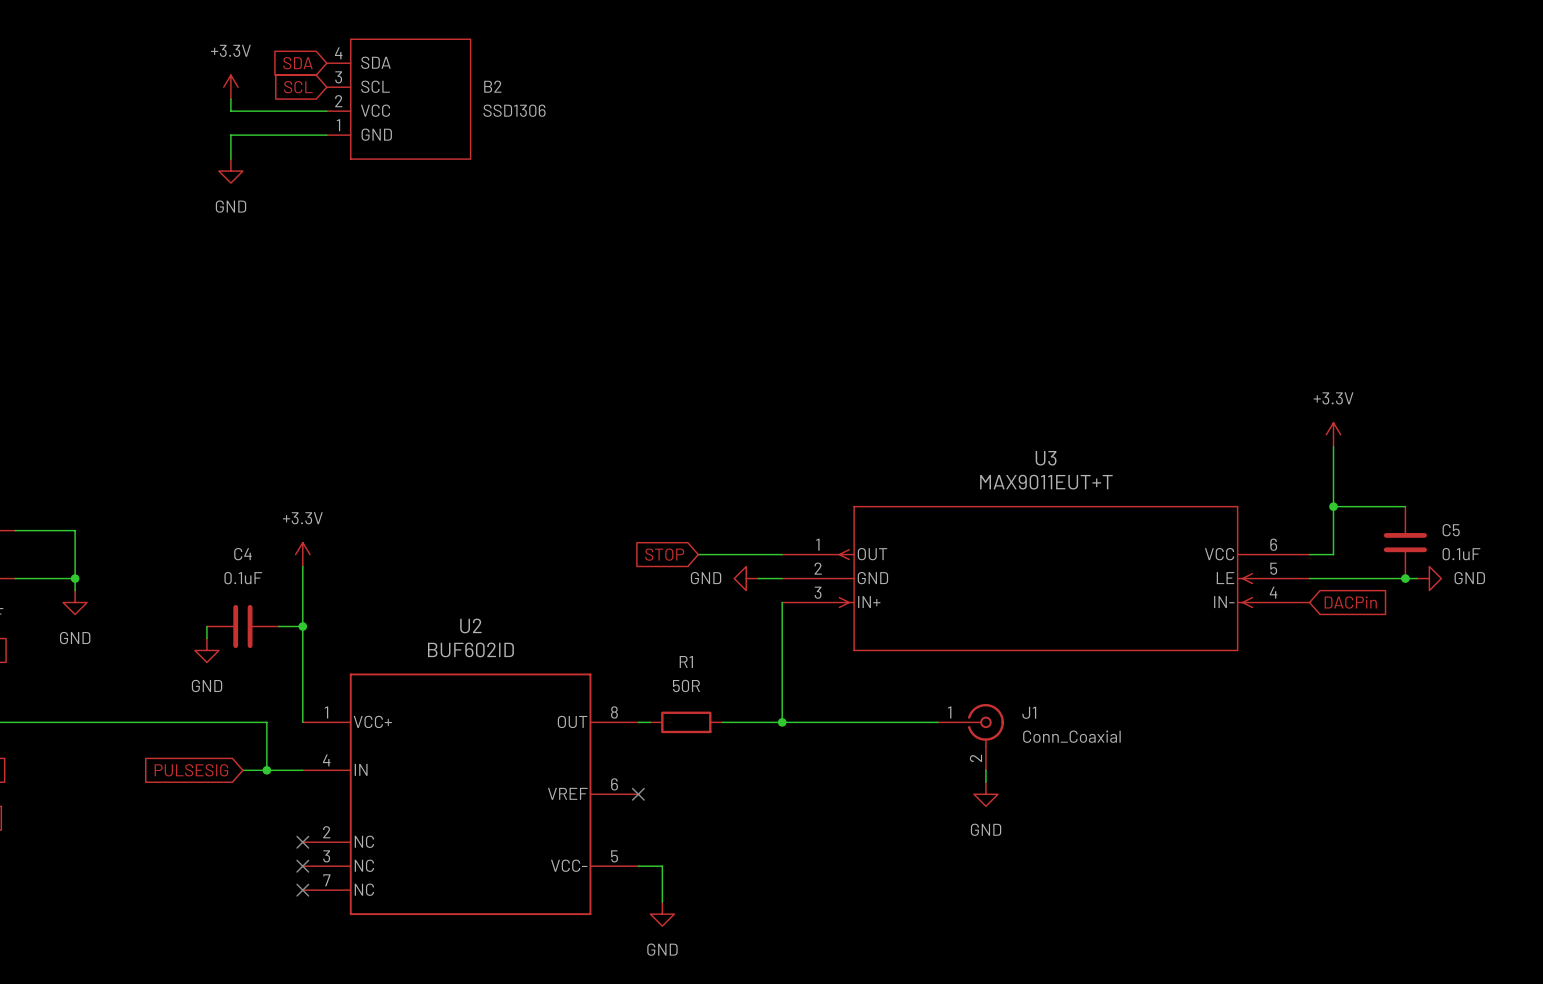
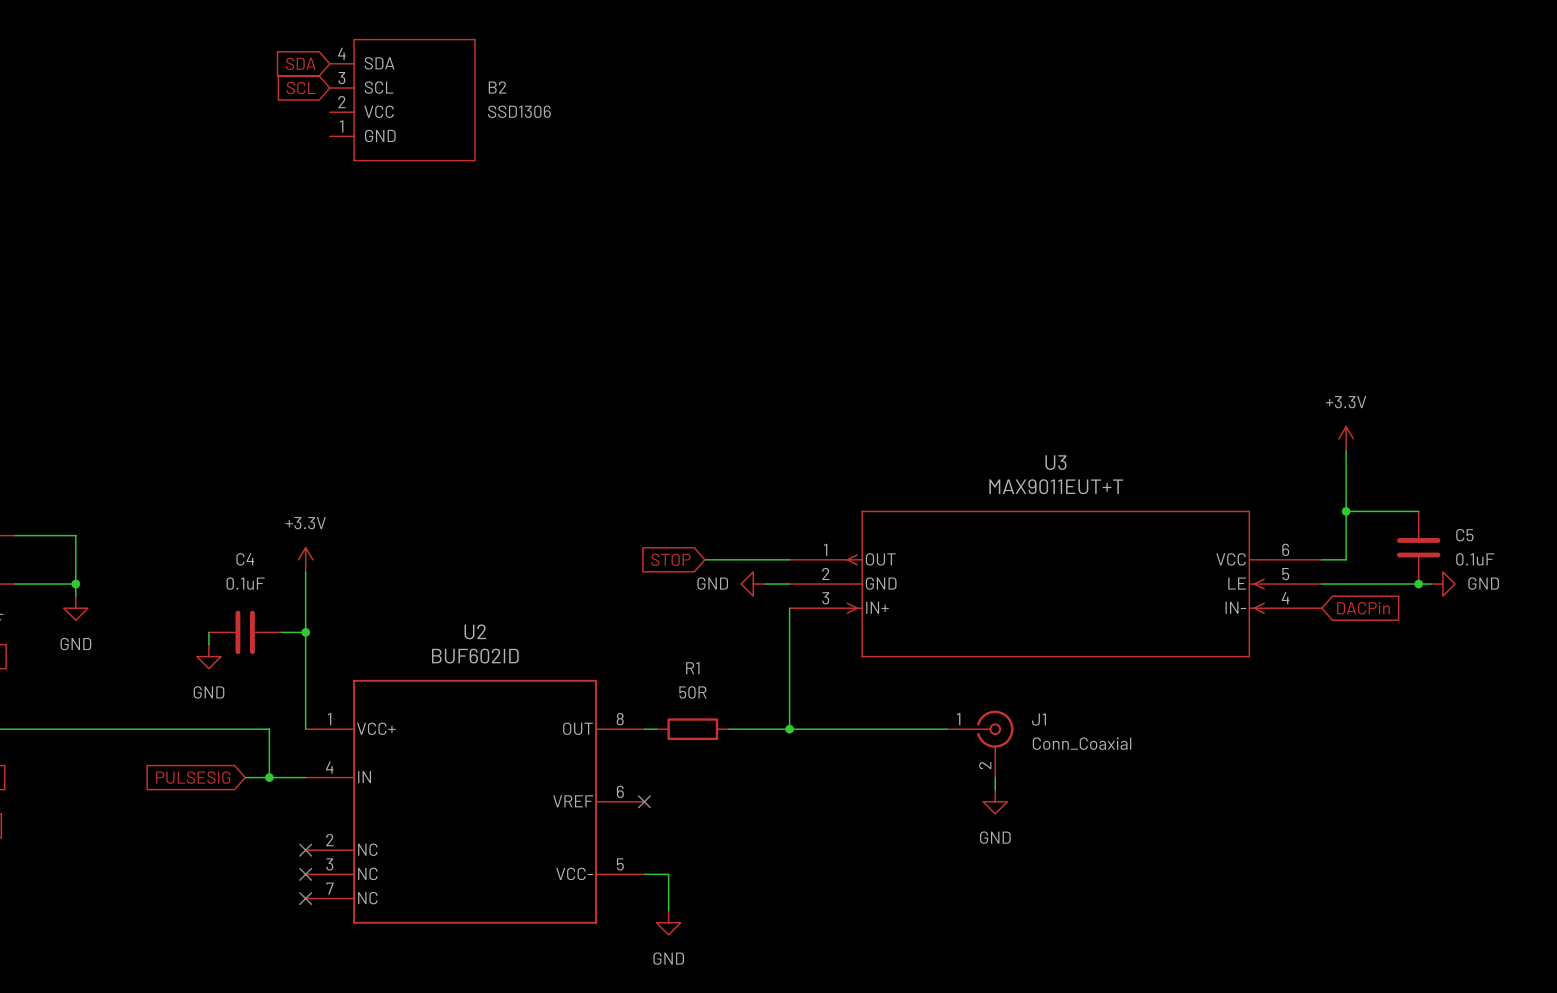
power symbol: +3.3V (230, 87) -> none
wire: (230, 99) (230, 111) (326, 111) -> none
wire: (326, 135) (230, 135) (230, 159) -> none
power symbol: GND (230, 171) -> none

